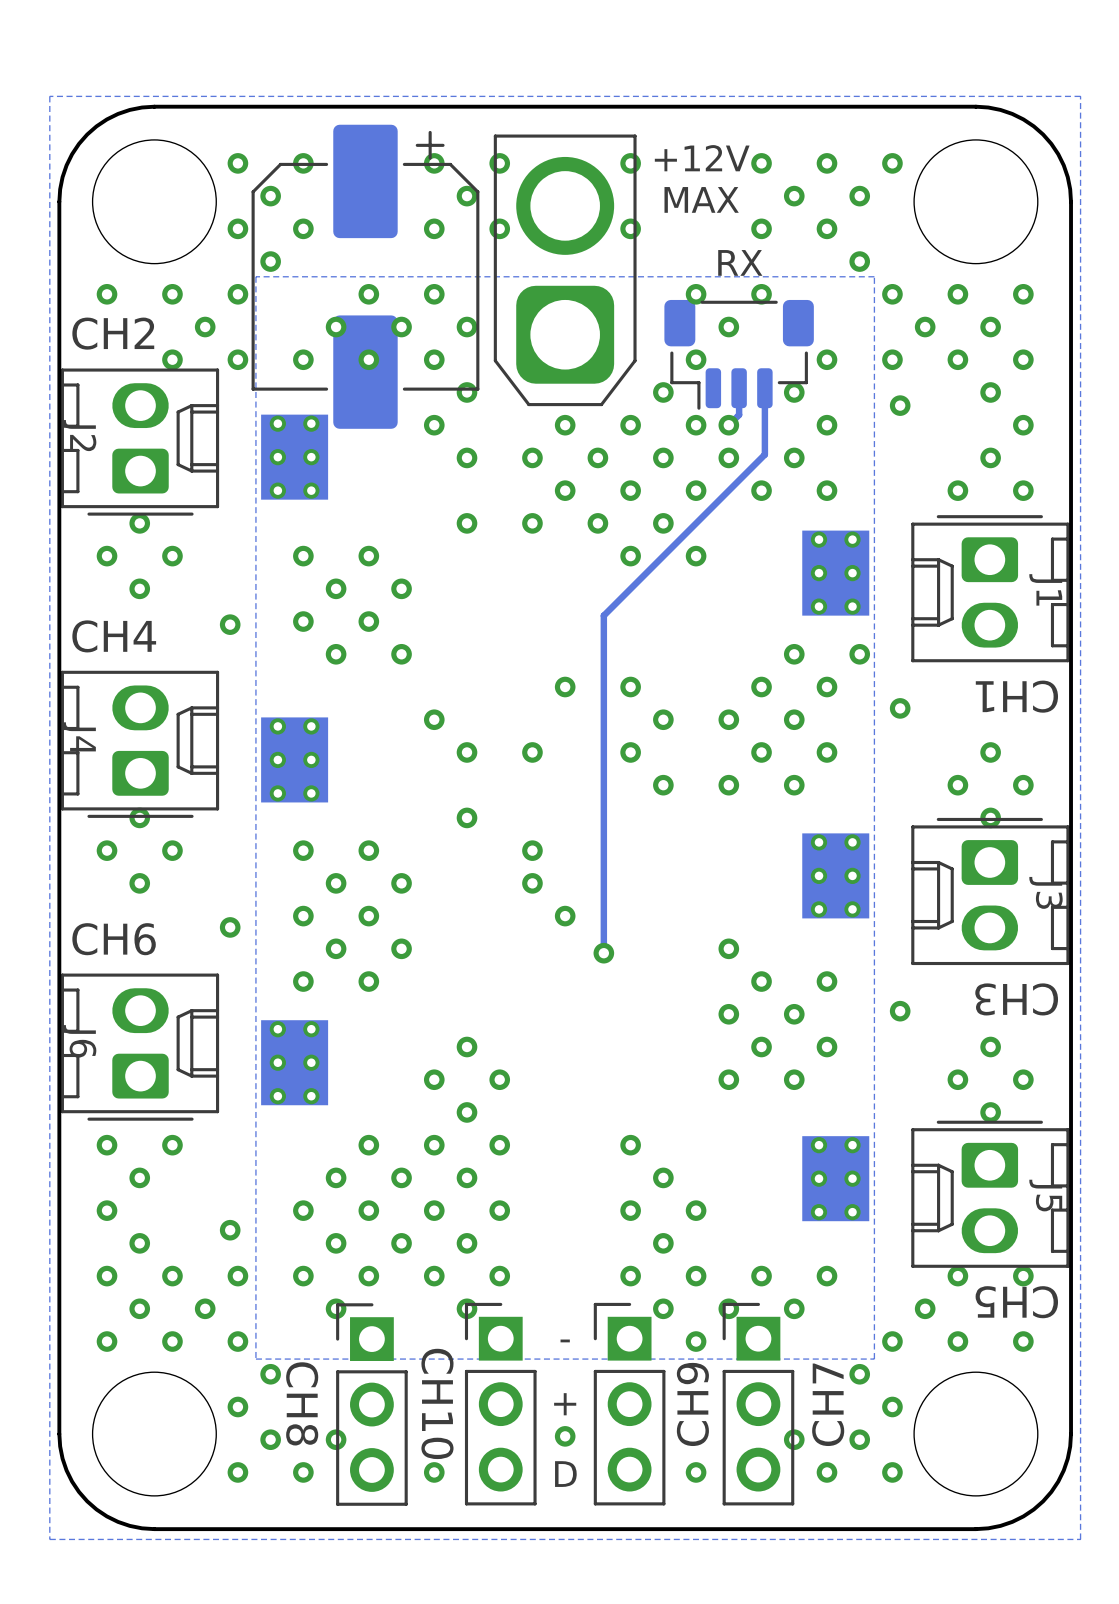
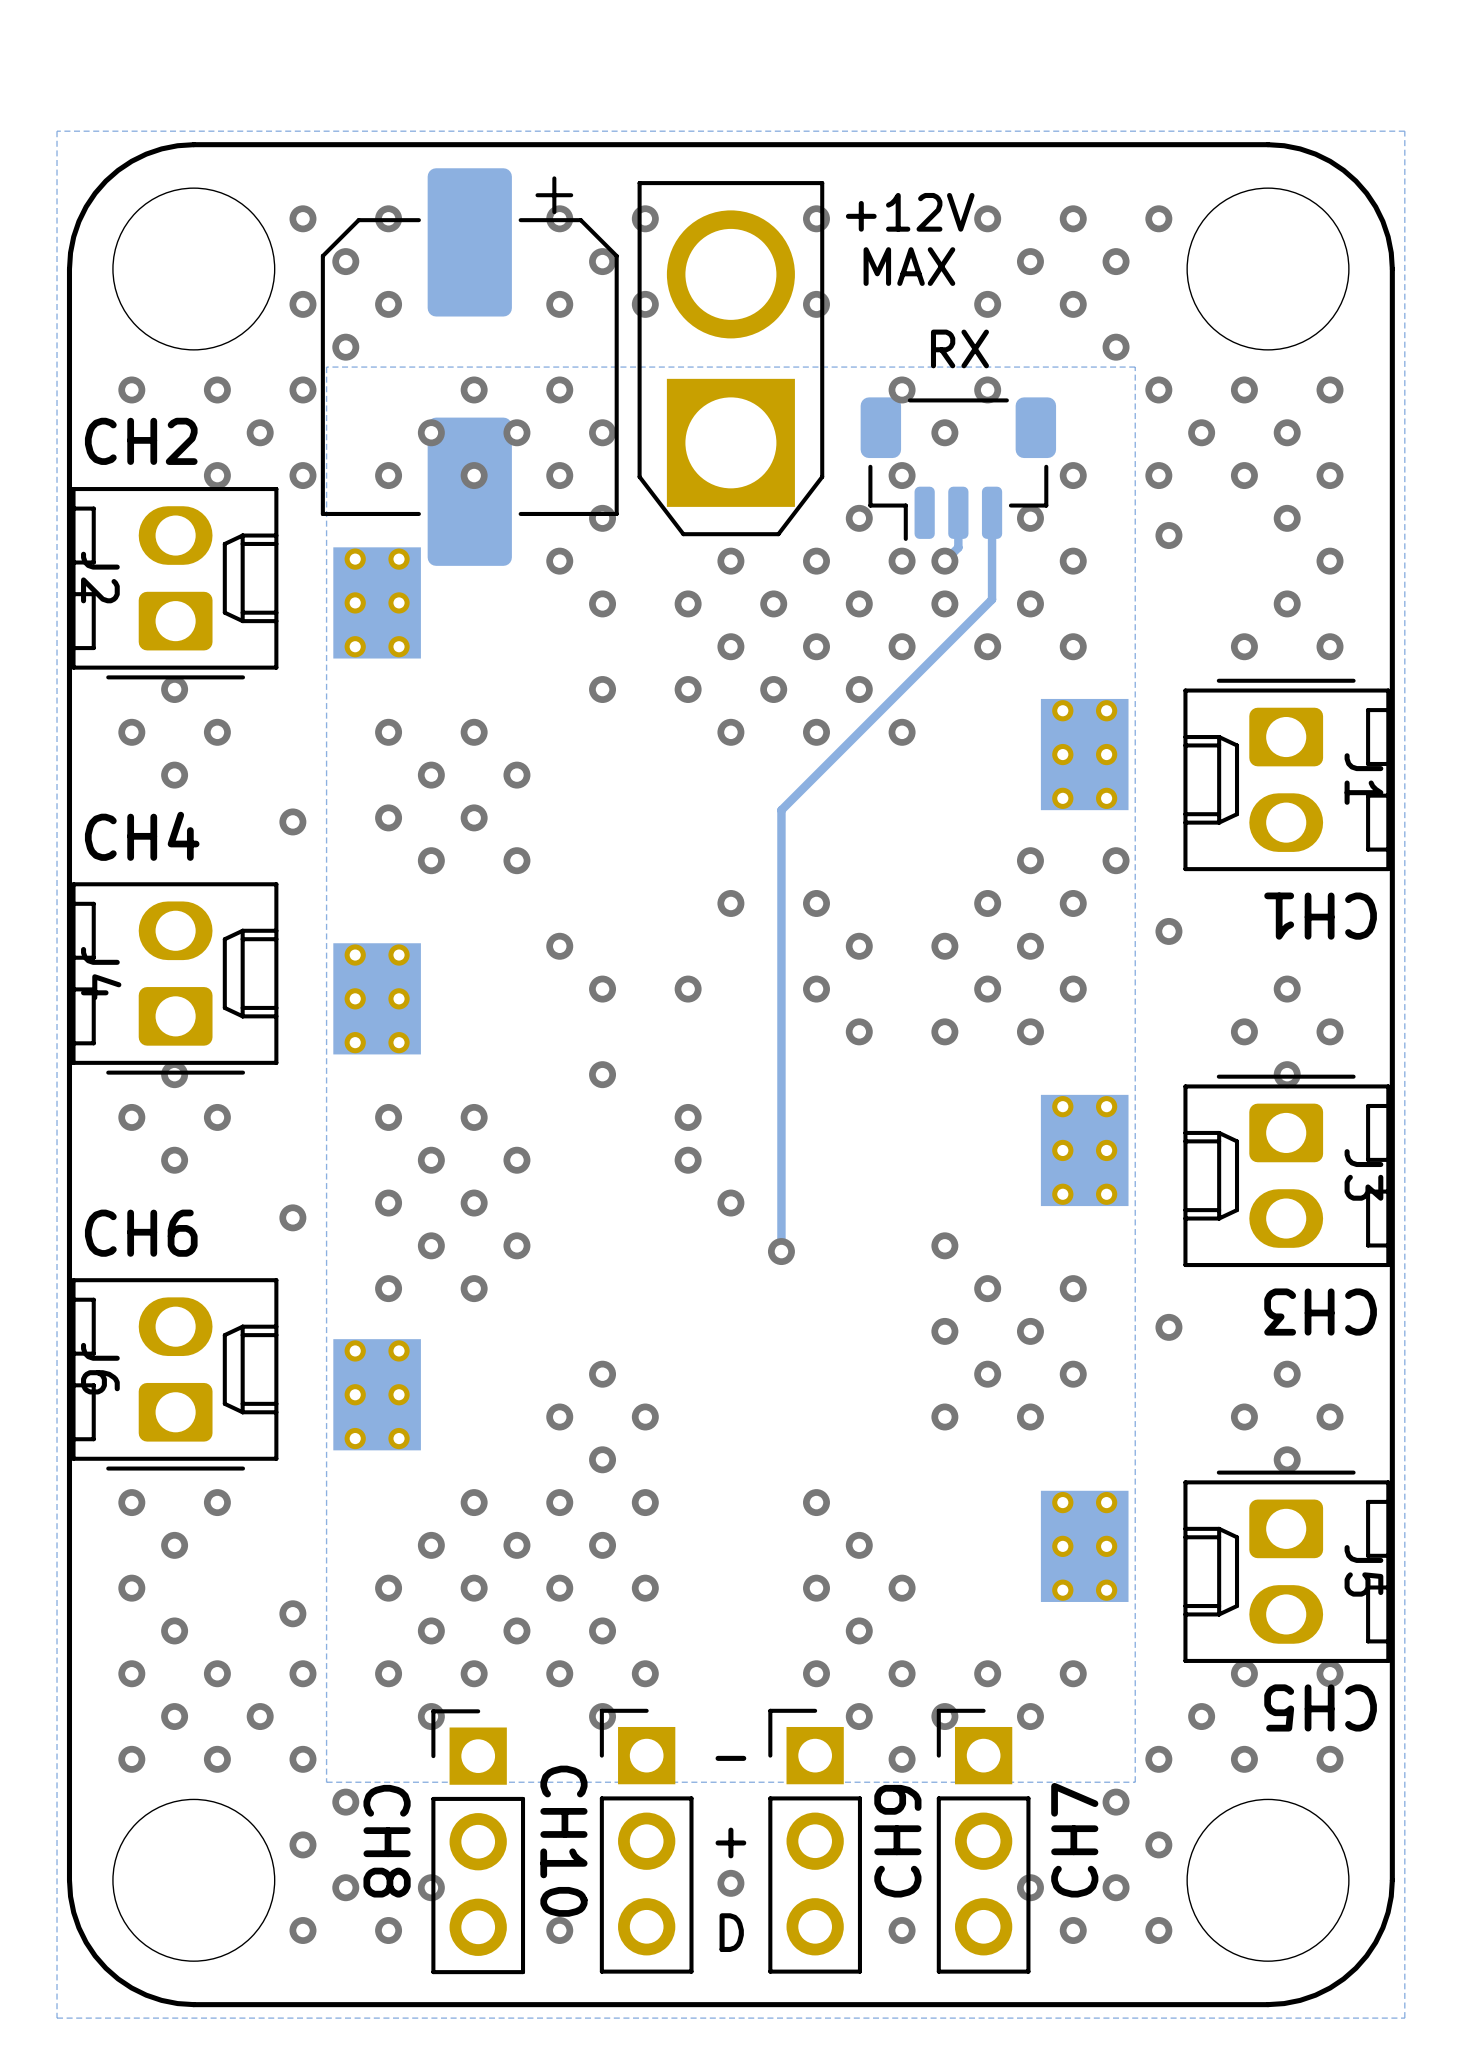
part footprint: [493, 134, 637, 407] -> [637, 181, 825, 537]
via: none -> (730, 732)

